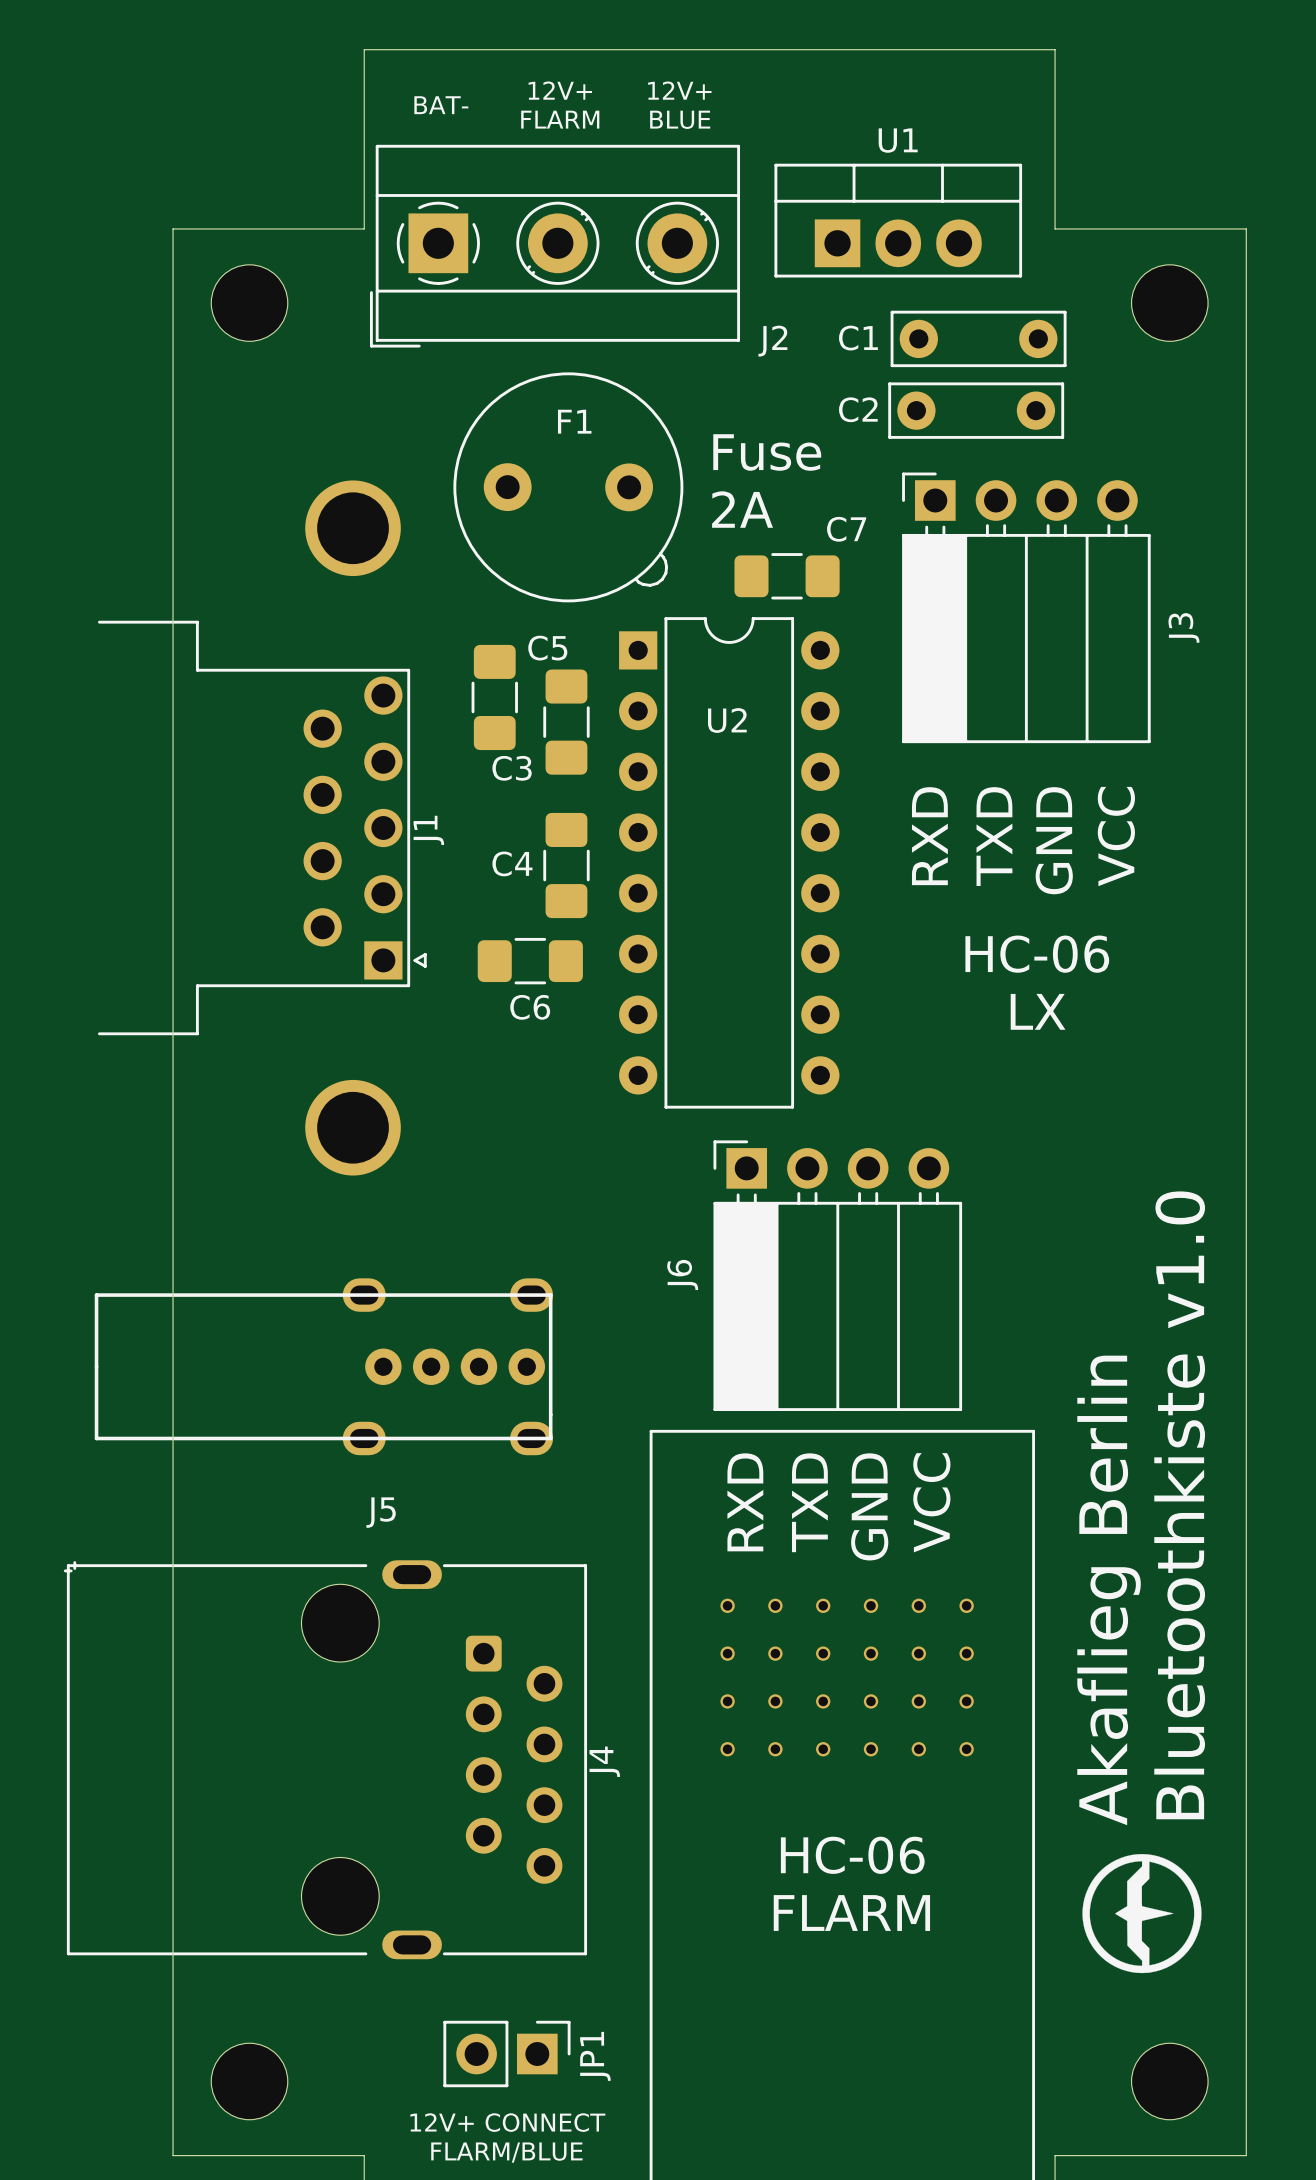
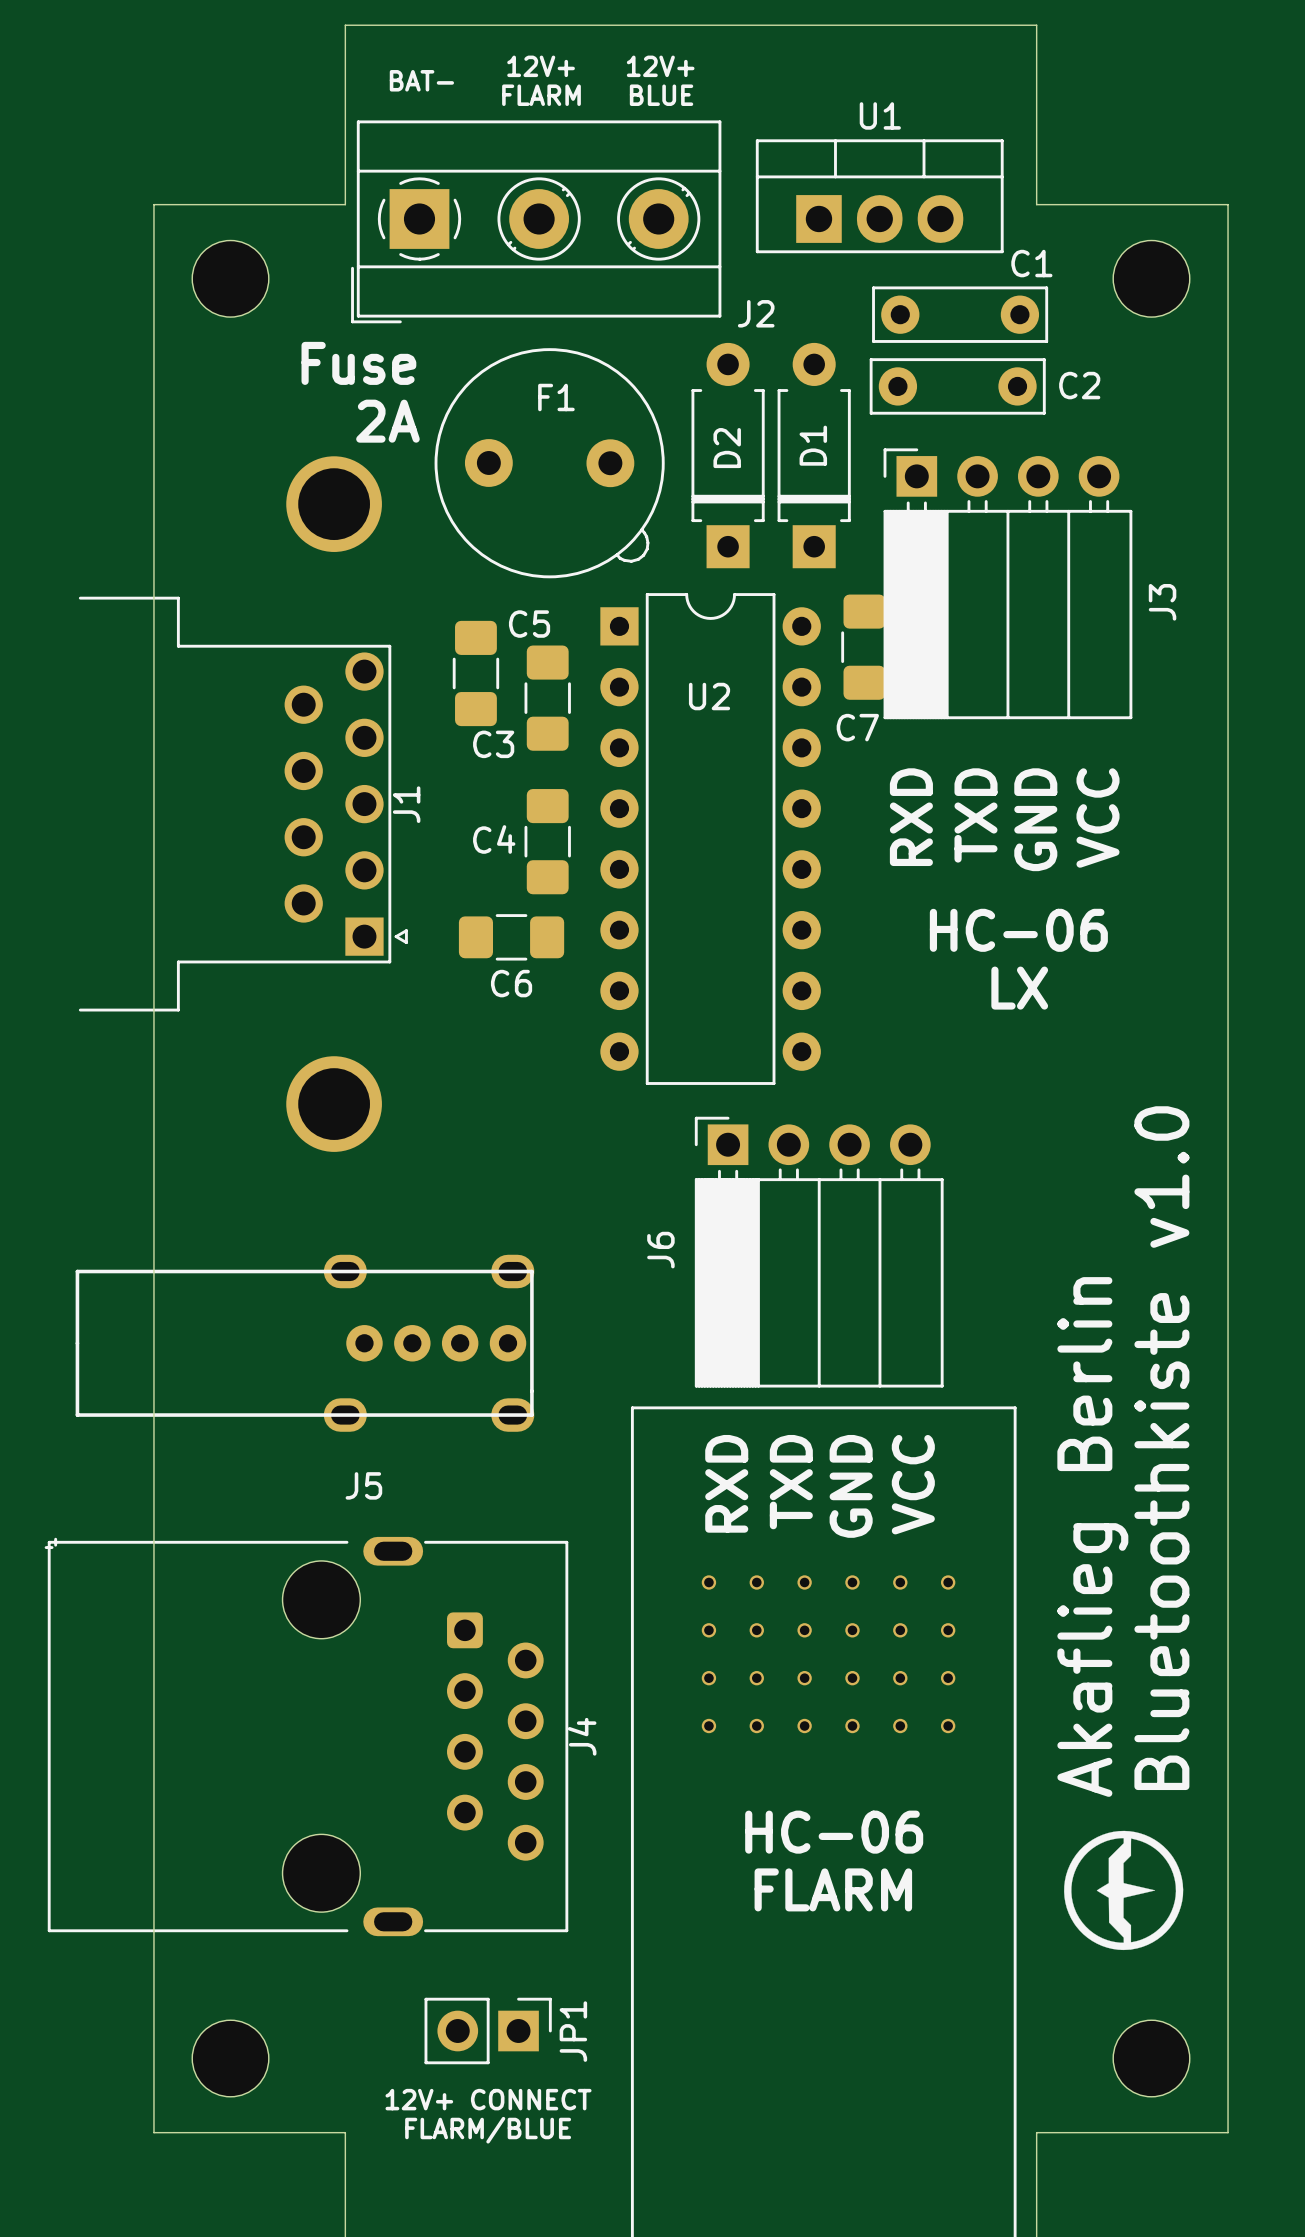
C1 name position: C1 (858, 338) -> C1 (1031, 263)
C2 name position: C2 (858, 409) -> C2 (1079, 385)
text position: Fuse (767, 452) -> Fuse (358, 363)
D2: none -> (728, 455)
D1: none -> (814, 455)
text position: 2A (742, 509) -> 2A (387, 421)
C7 name position: C7 (846, 529) -> C7 (857, 727)
C7 rotation: 0° (787, 576) -> 90° clockwise (864, 647)
C7 position: (787, 576) -> (864, 647)

